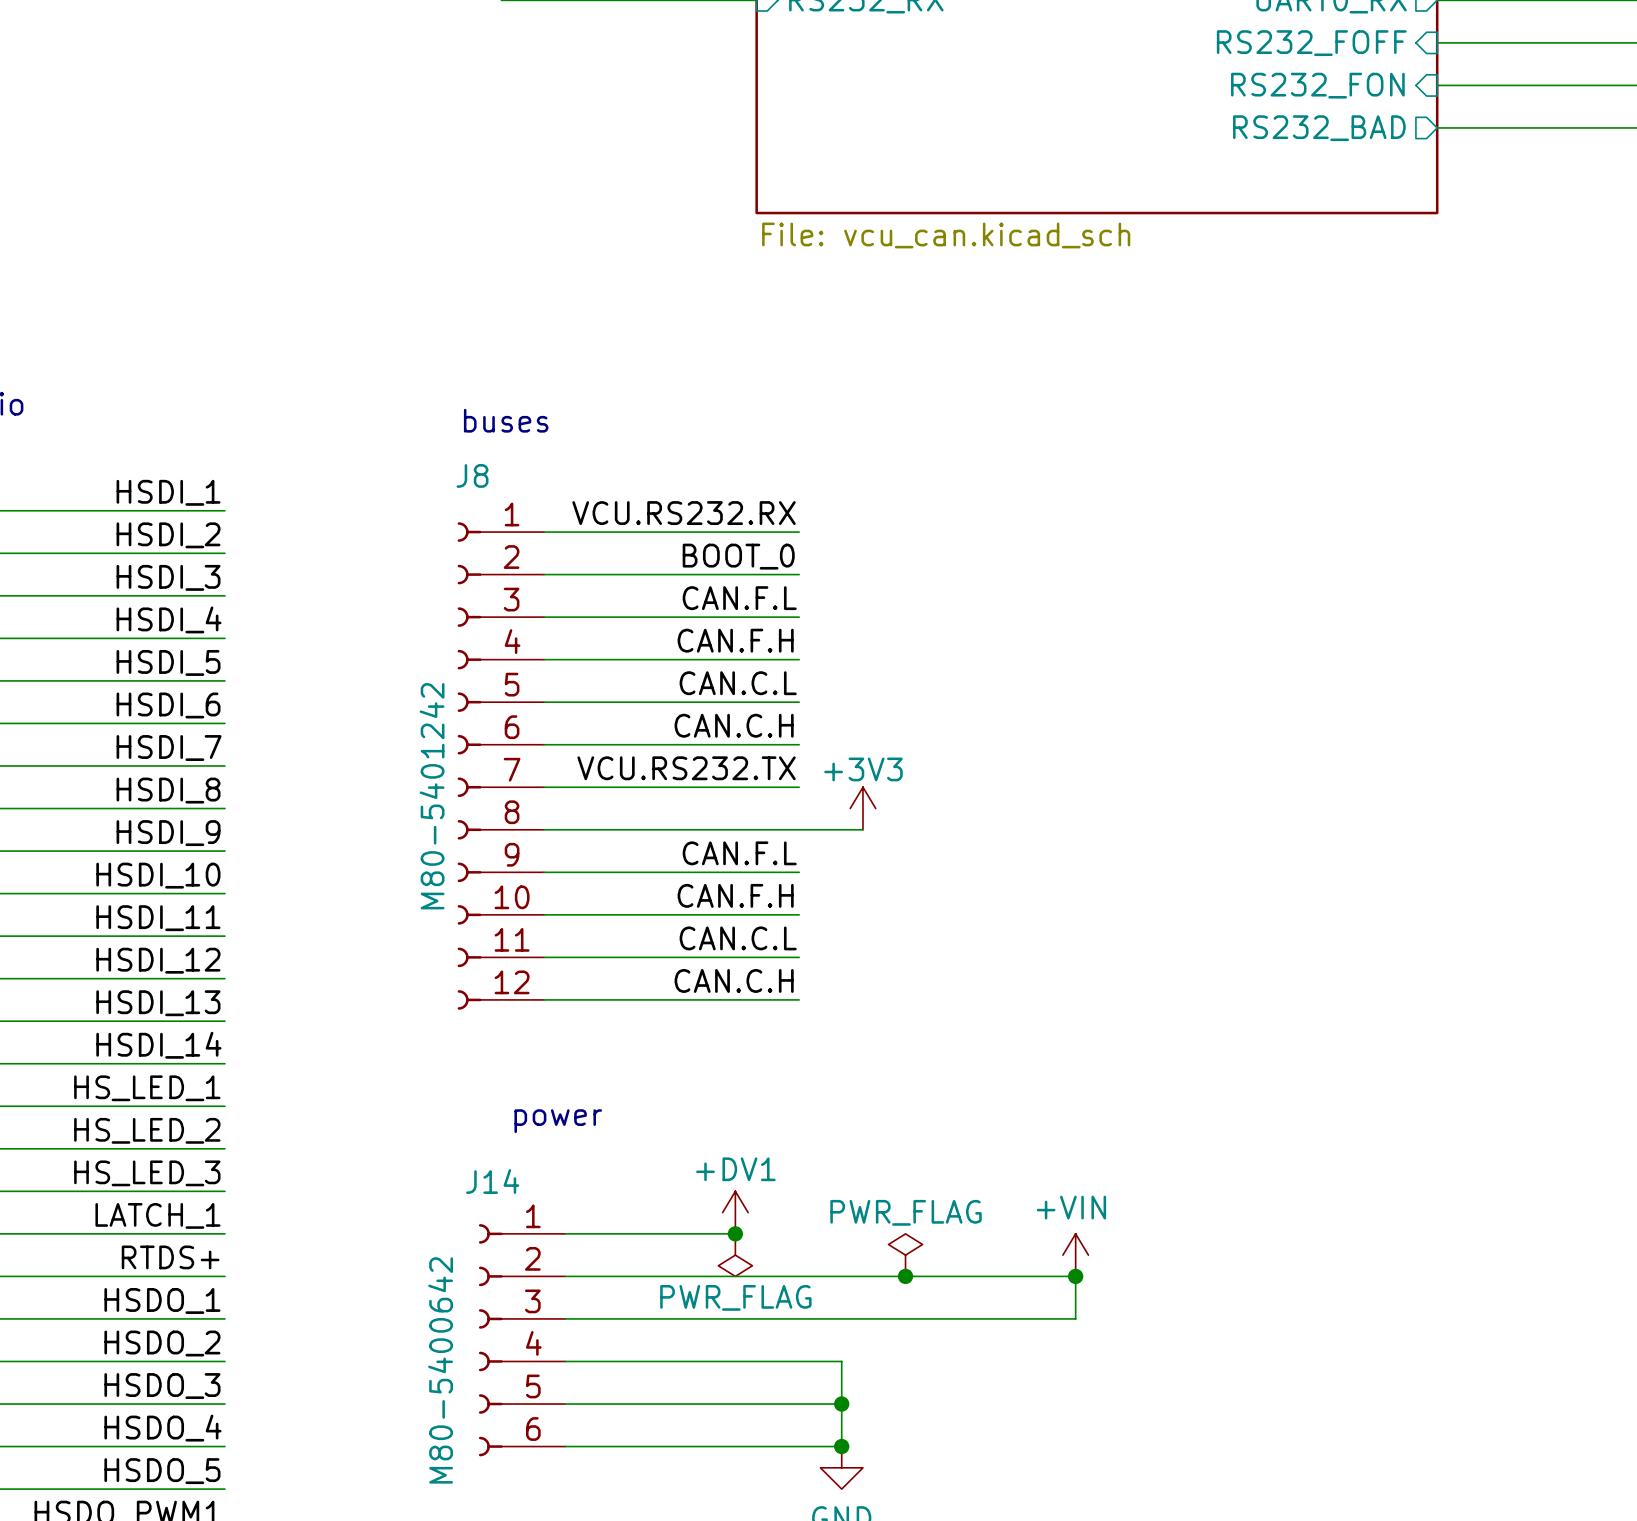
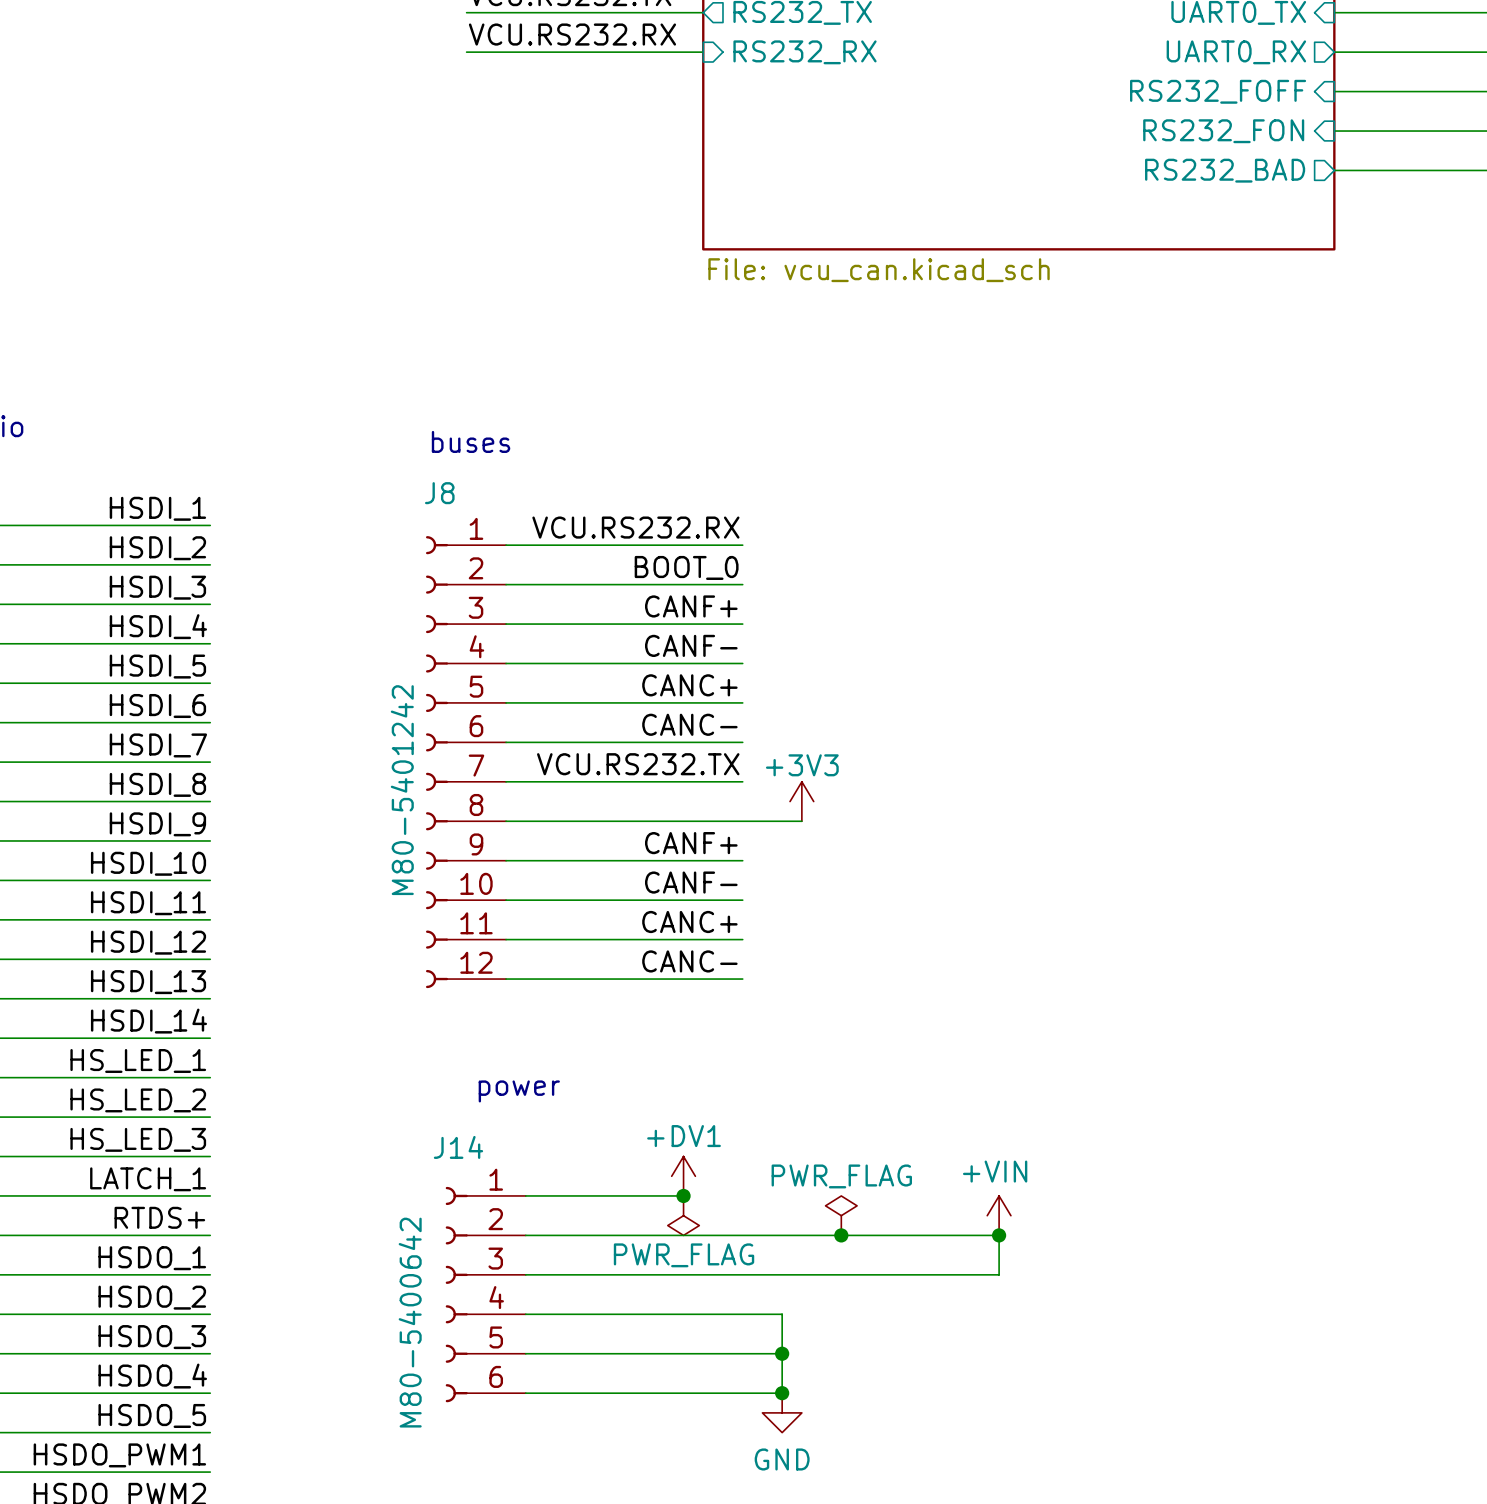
label: CAN.F.L (739, 598) -> CANF+ (691, 606)
label: CAN.F.H (735, 640) -> CANF- (691, 645)
label: CAN.C.L (738, 683) -> CANC+ (689, 685)
label: CAN.C.H (734, 725) -> CANC- (689, 724)
label: CAN.F.L (739, 853) -> CANF+ (691, 843)
label: CAN.F.H (735, 895) -> CANF- (691, 882)
label: CAN.C.L (738, 938) -> CANC+ (689, 921)
label: CAN.C.H (734, 980) -> CANC- (689, 961)

